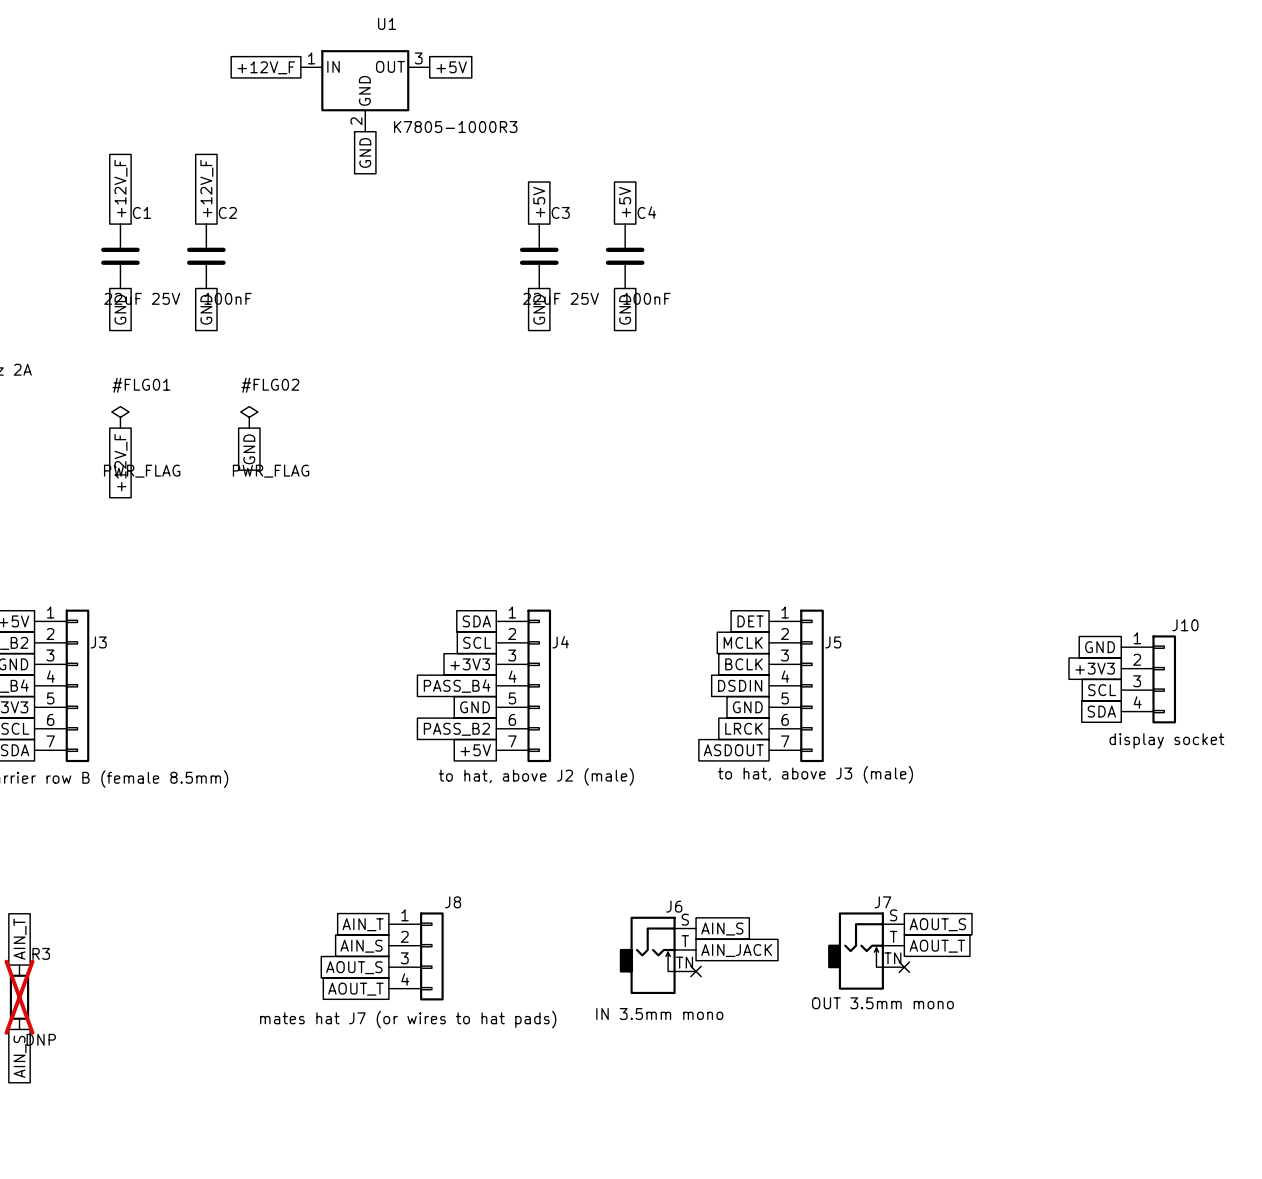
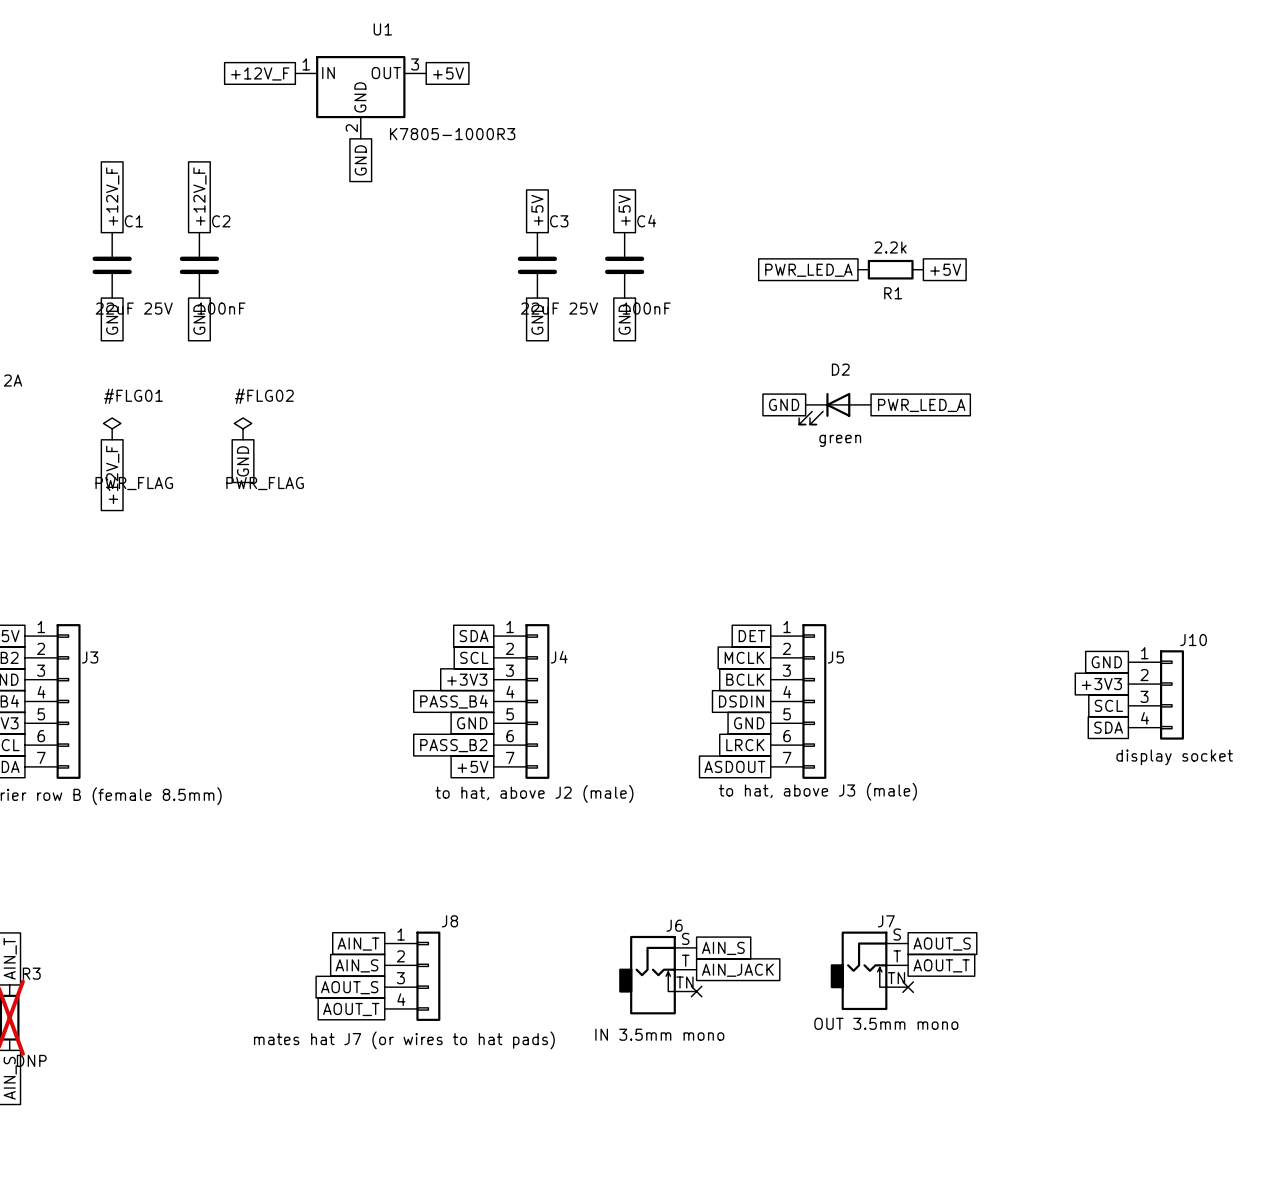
R1: none -> 2.2k (890, 269)
global label: none -> +5V (945, 269)
global label: none -> PWR_LED_A (808, 270)
global label: none -> GND (784, 404)
global label: none -> PWR_LED_A (921, 405)
D2: none -> green (835, 408)

